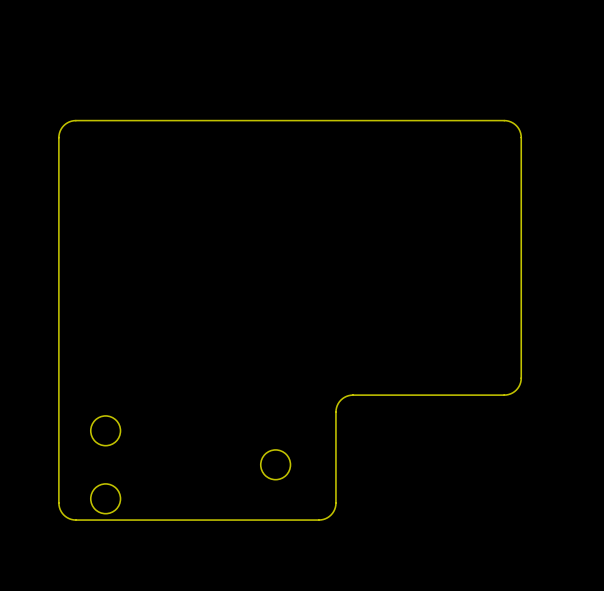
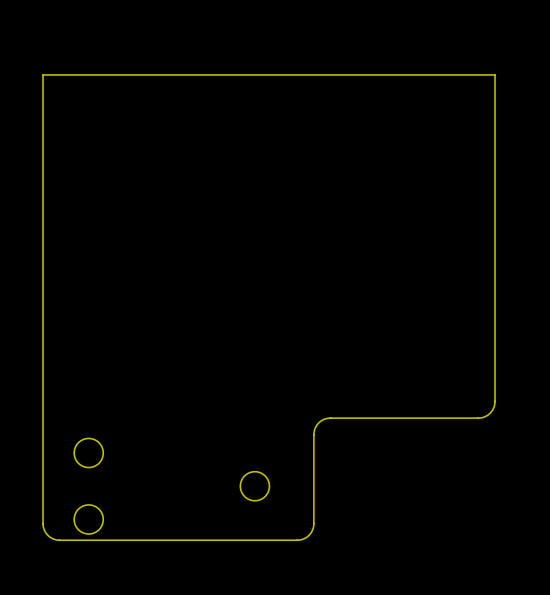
board edge: (521, 137) (516, 125) (504, 120) (75, 120) (63, 125) (58, 137) -> (495, 166) (495, 74) (43, 74) (43, 166)

